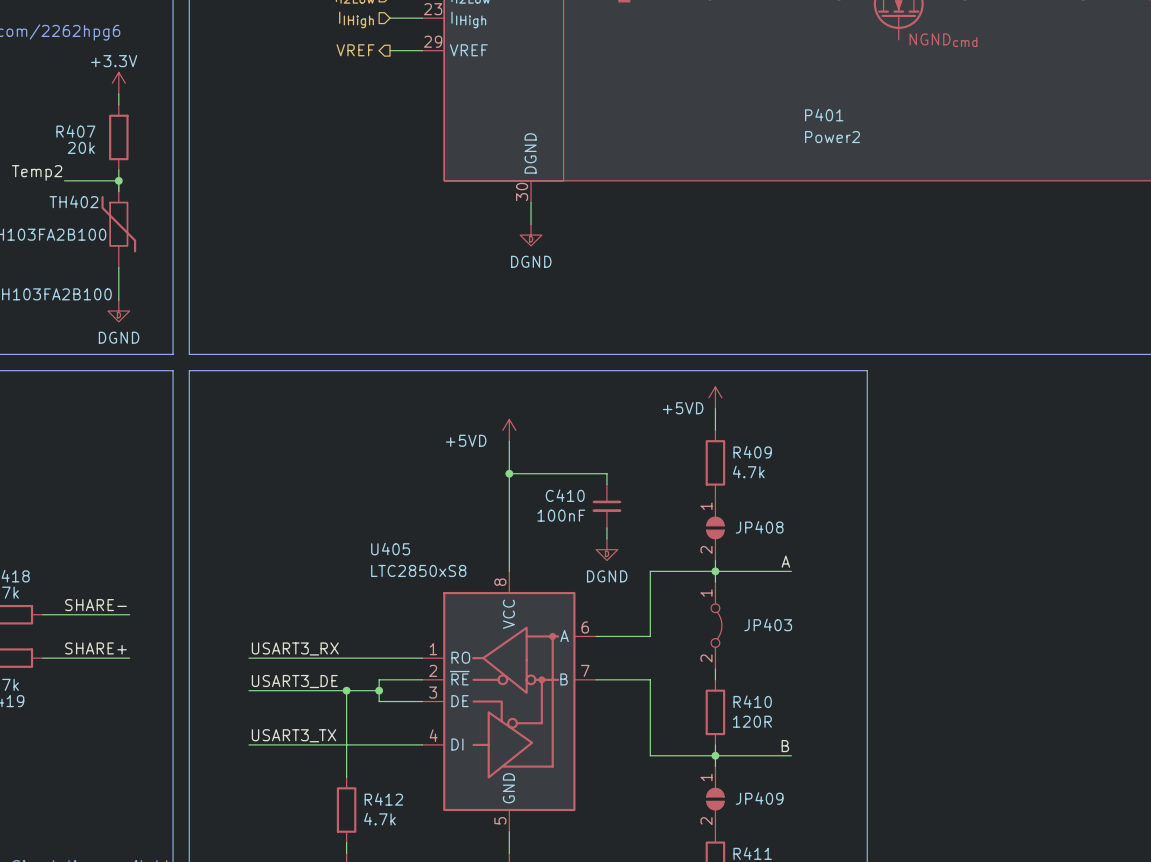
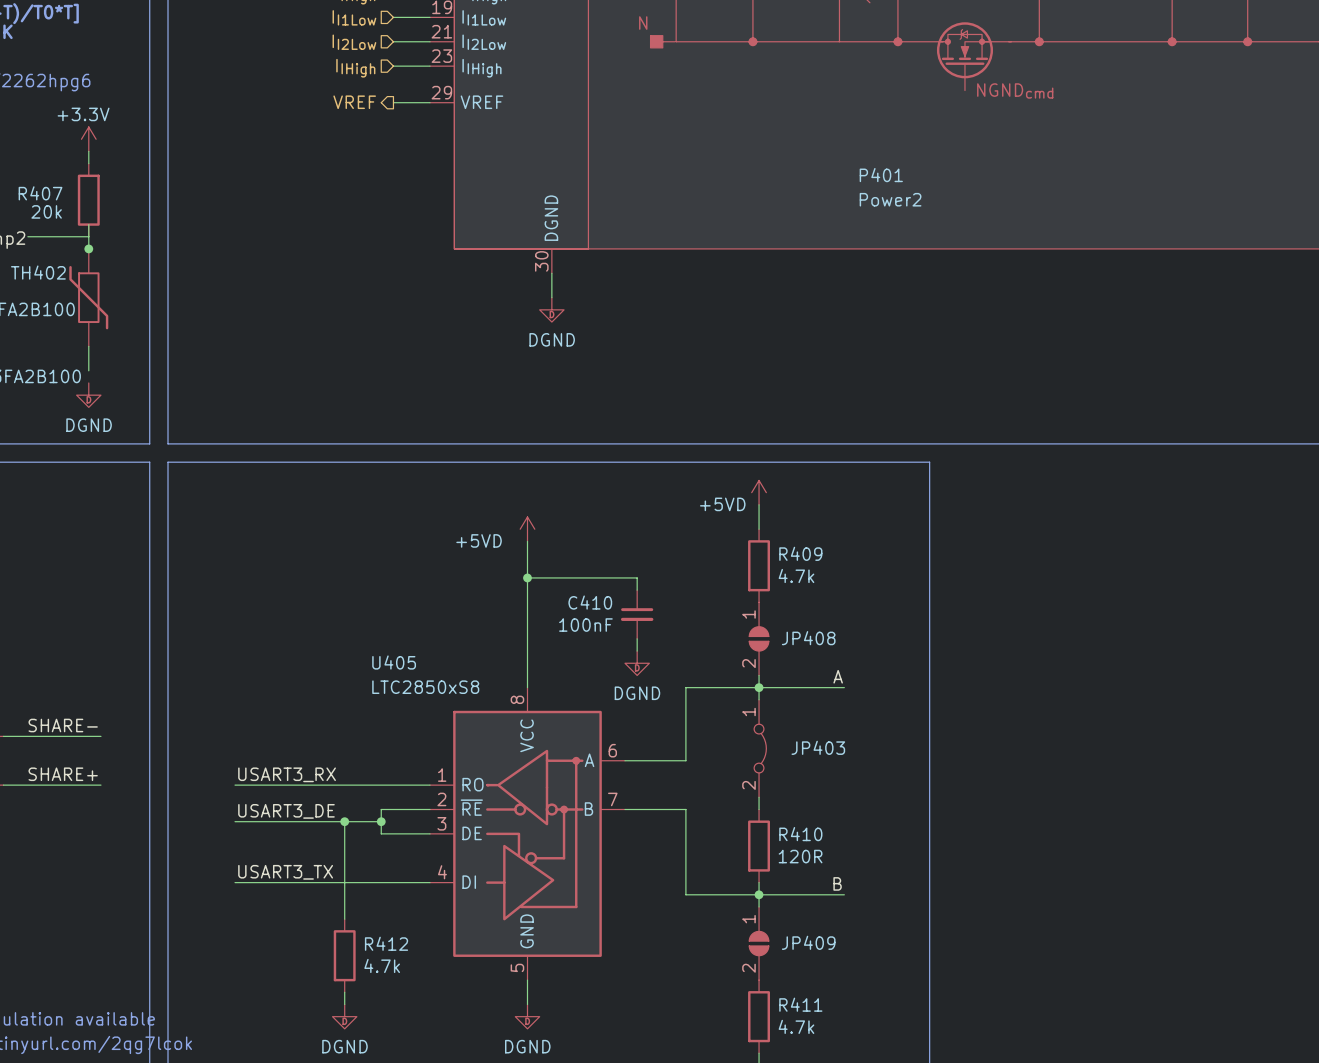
wire: none -> (88, 224) (88, 236) (27, 236)
wire: (64, 180) (118, 180) (118, 191) -> none
wire: (118, 289) (118, 300) -> none

